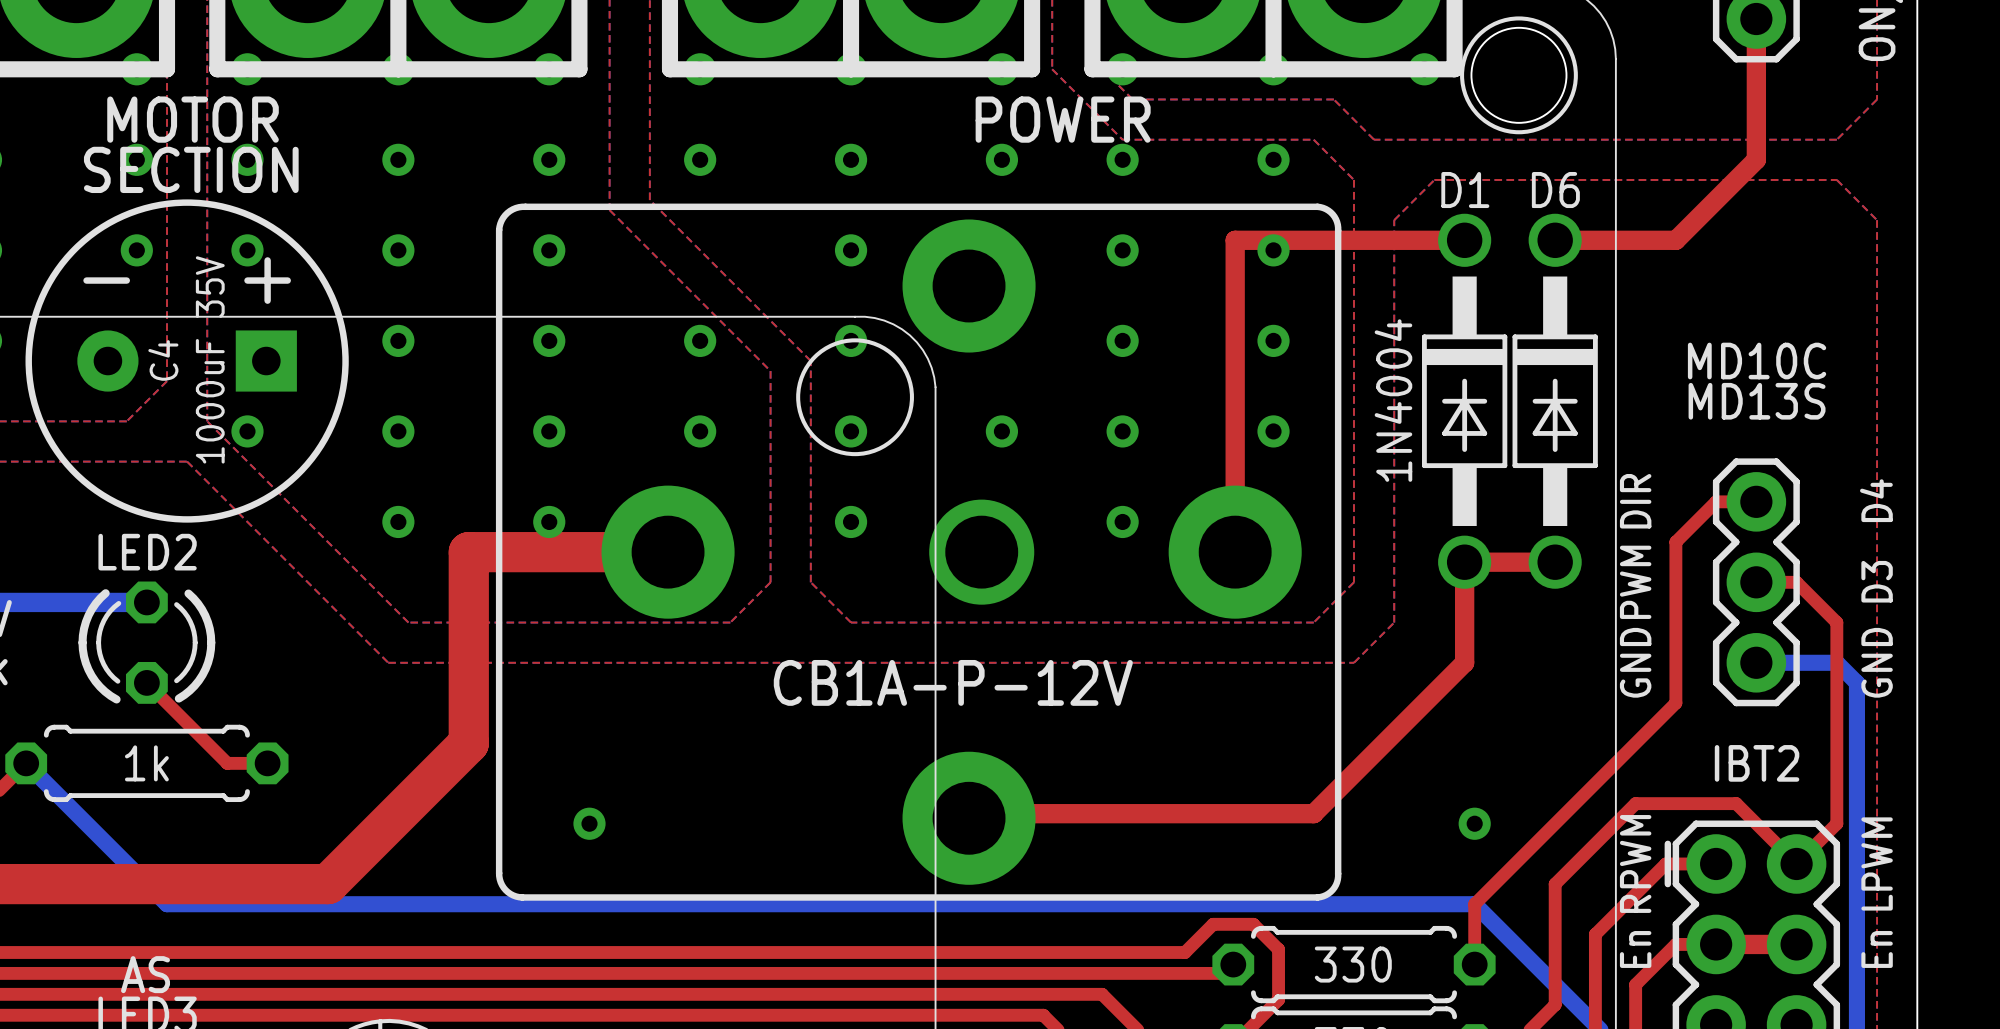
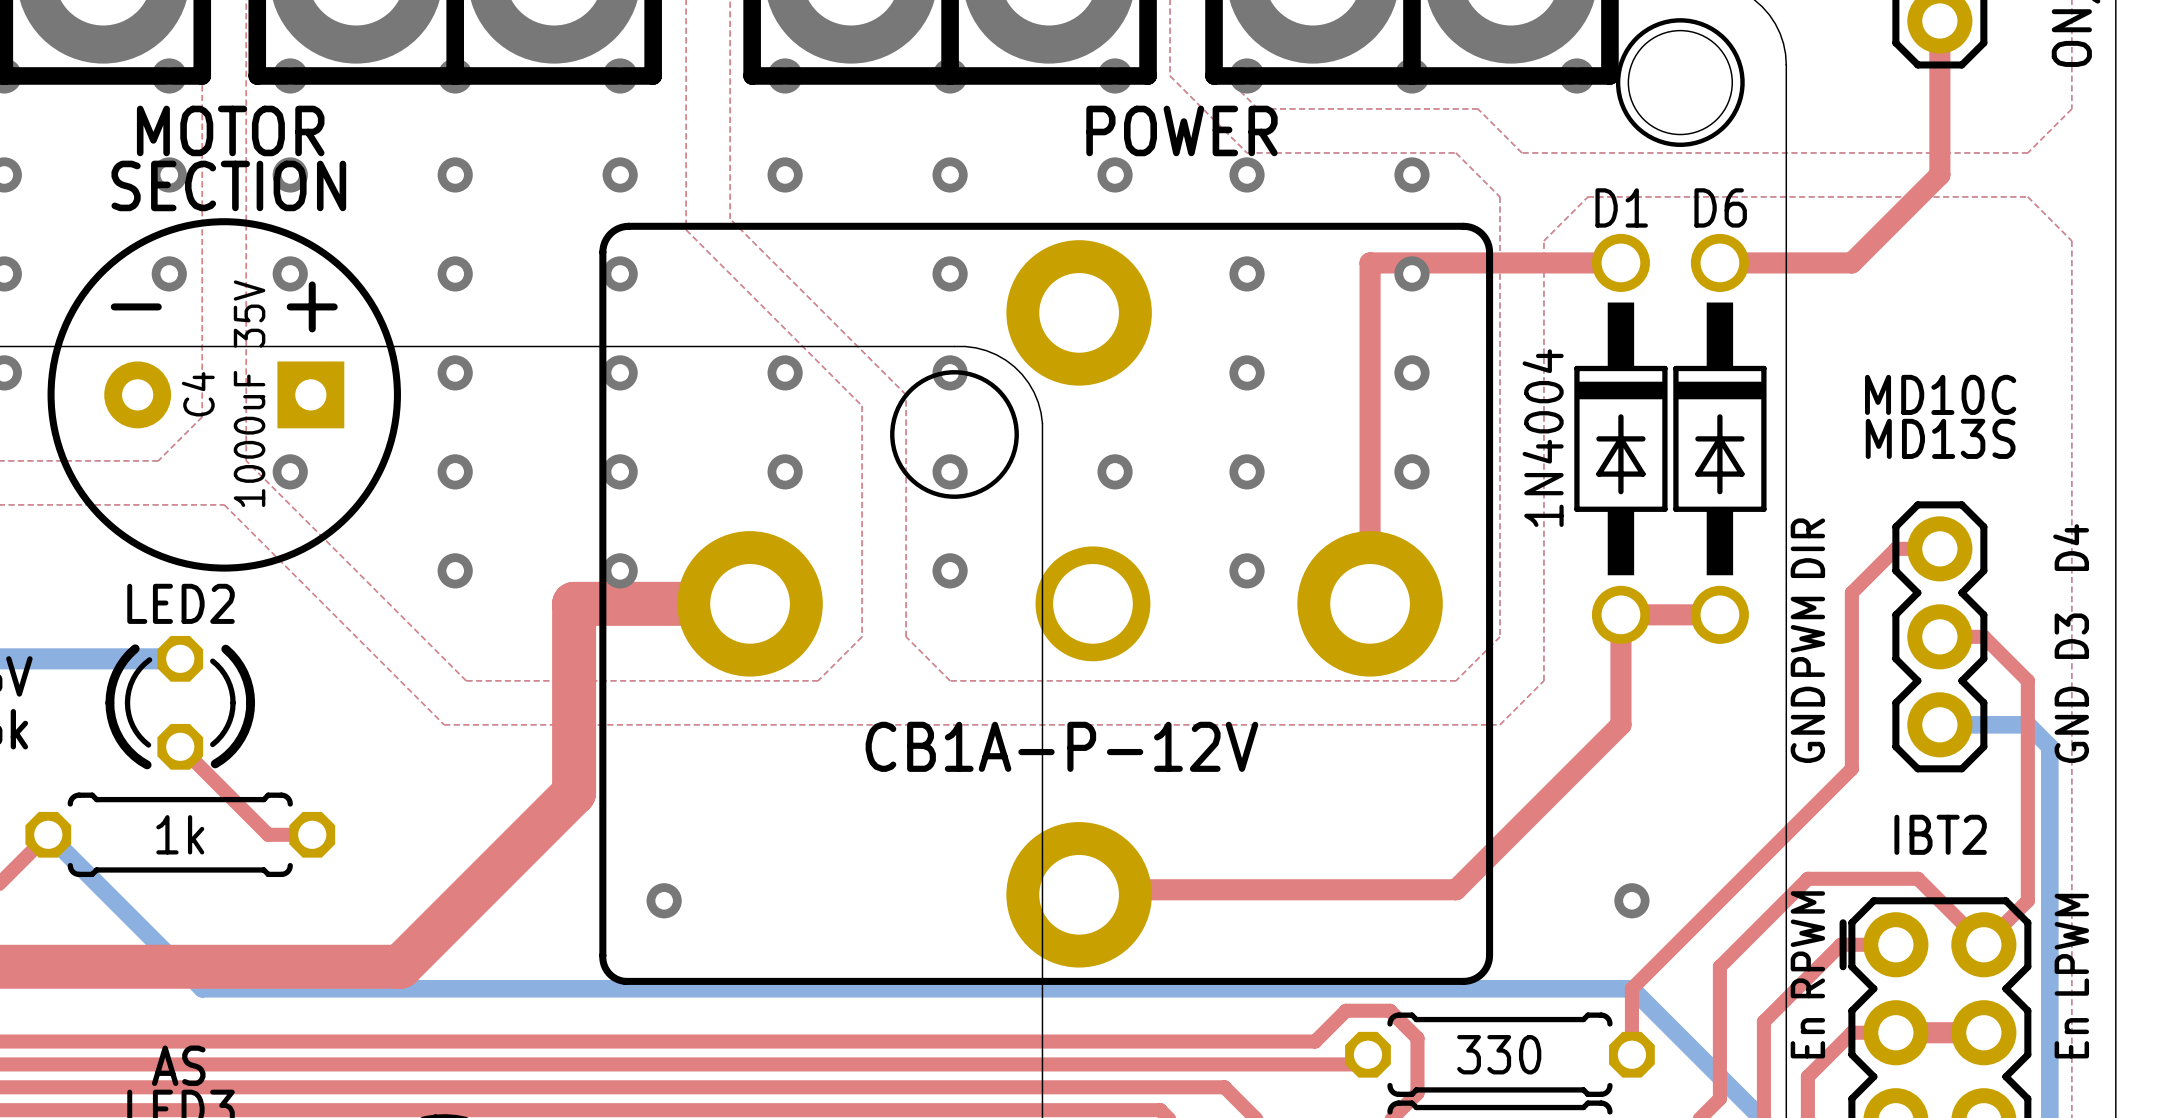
part footprint: [495, 203, 1342, 901] -> [599, 222, 1494, 985]
top track: (507, 552) (468, 552) (468, 743) (327, 884) -> (574, 603) (574, 792) (400, 966) (378, 966)

